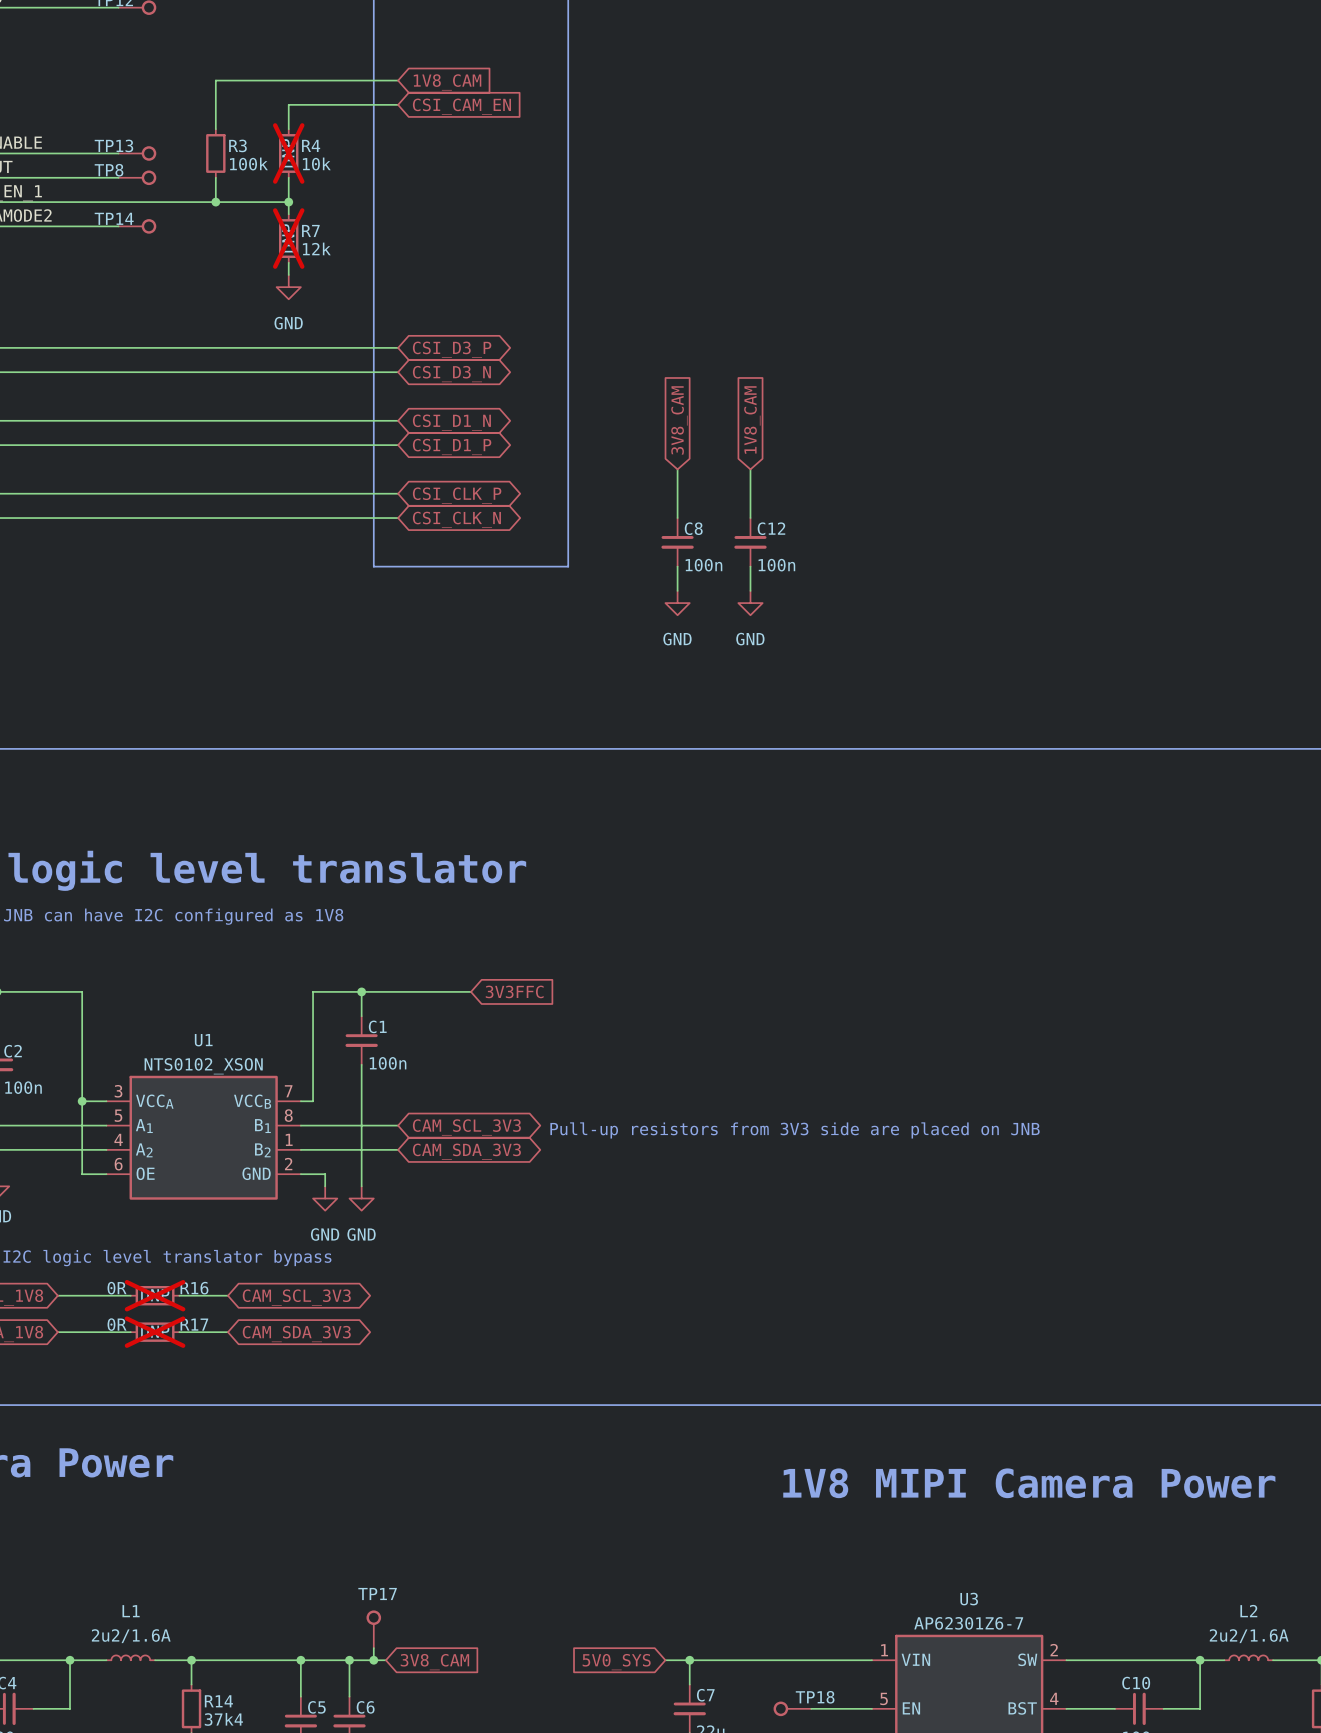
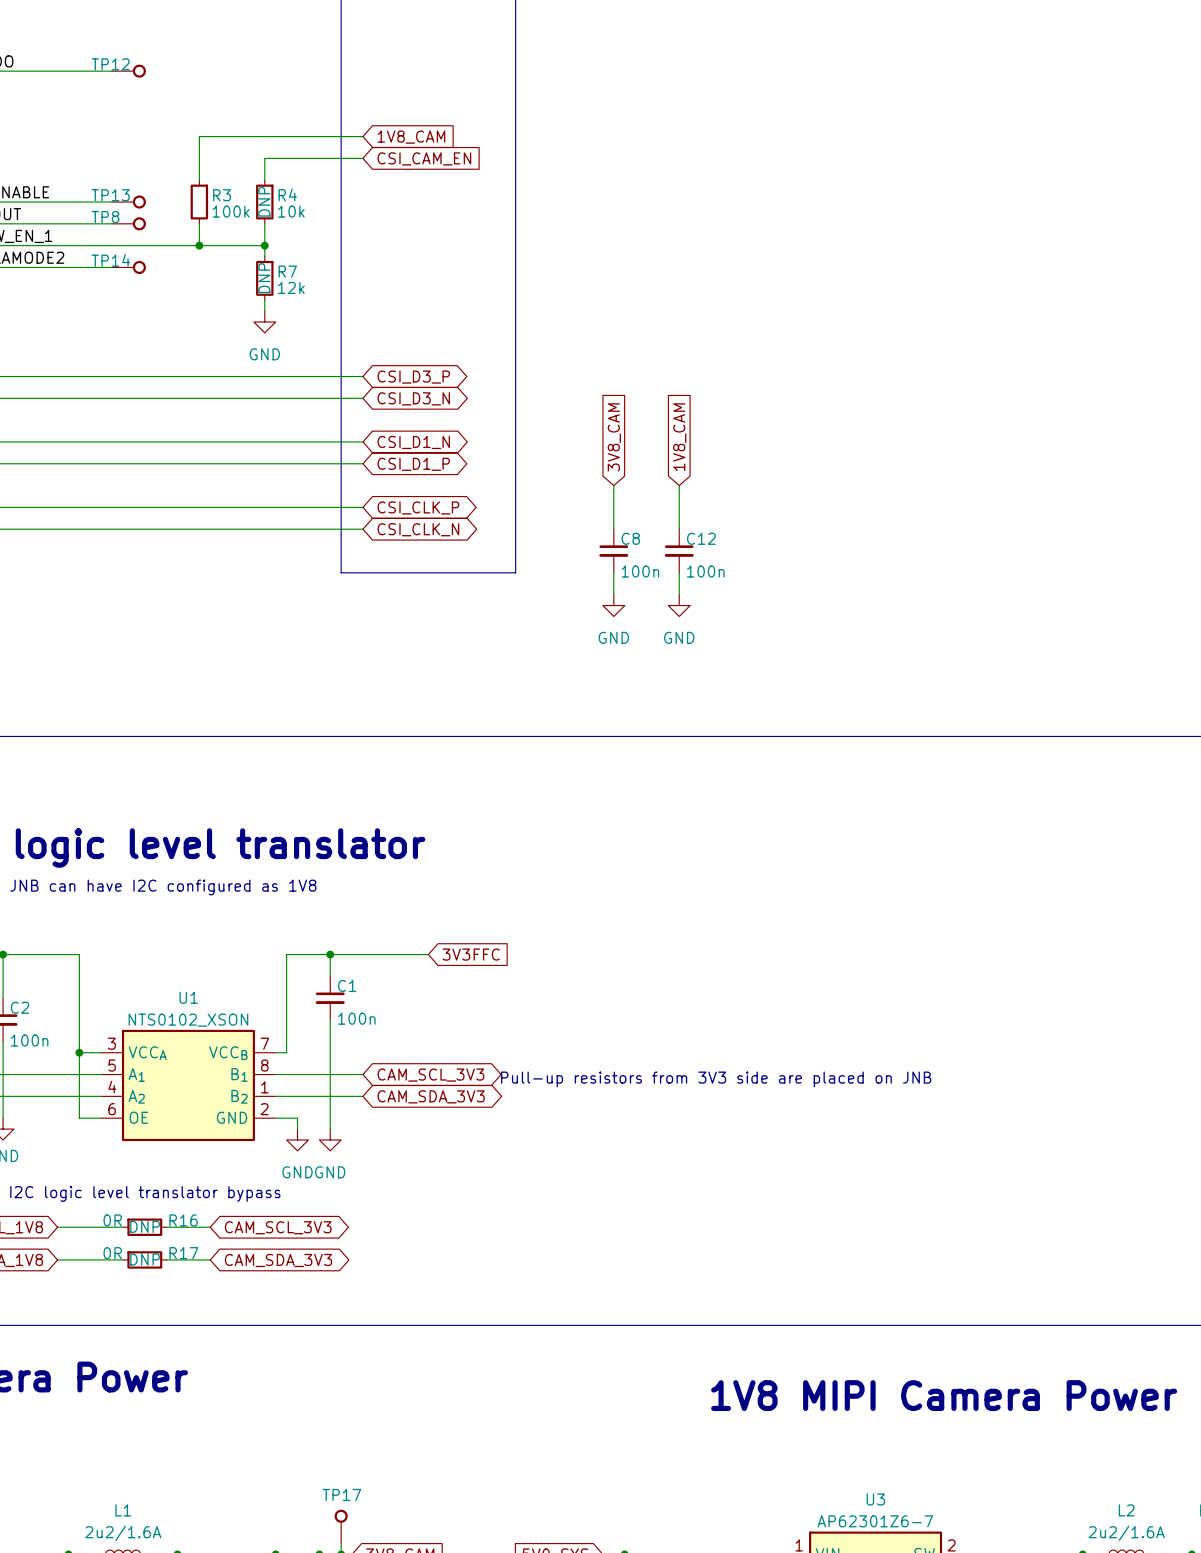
R4 do-not-place cross: (288, 153) -> none
R7 do-not-place cross: (288, 238) -> none
R16 do-not-place cross: (155, 1295) -> none
R17 do-not-place cross: (155, 1332) -> none

